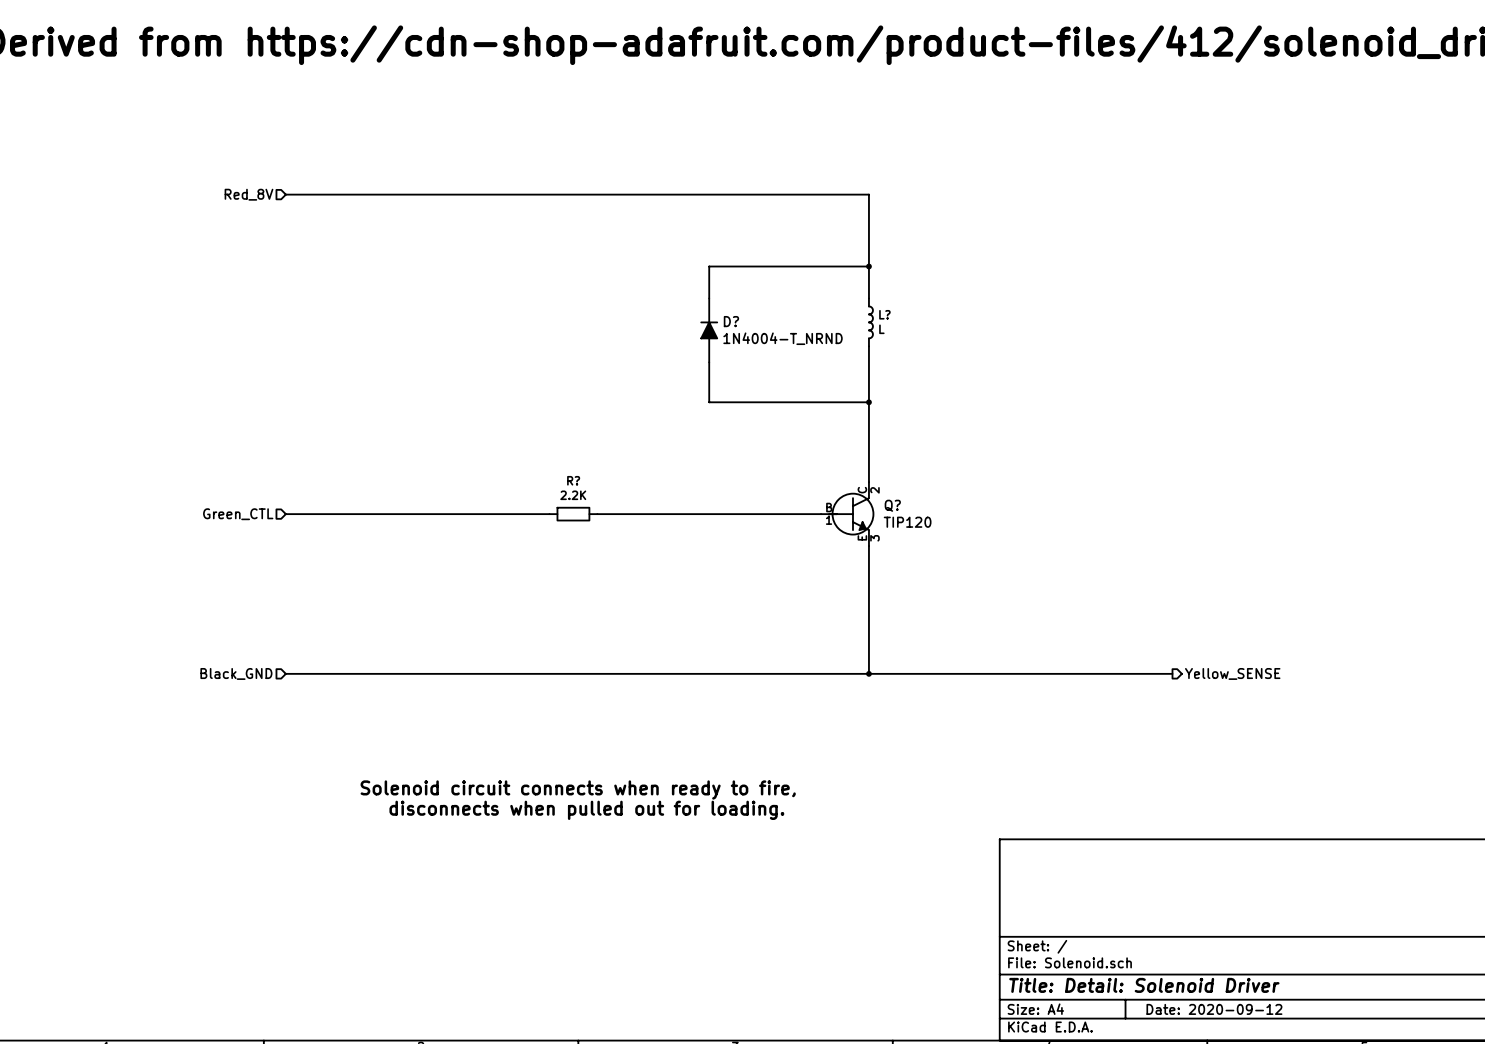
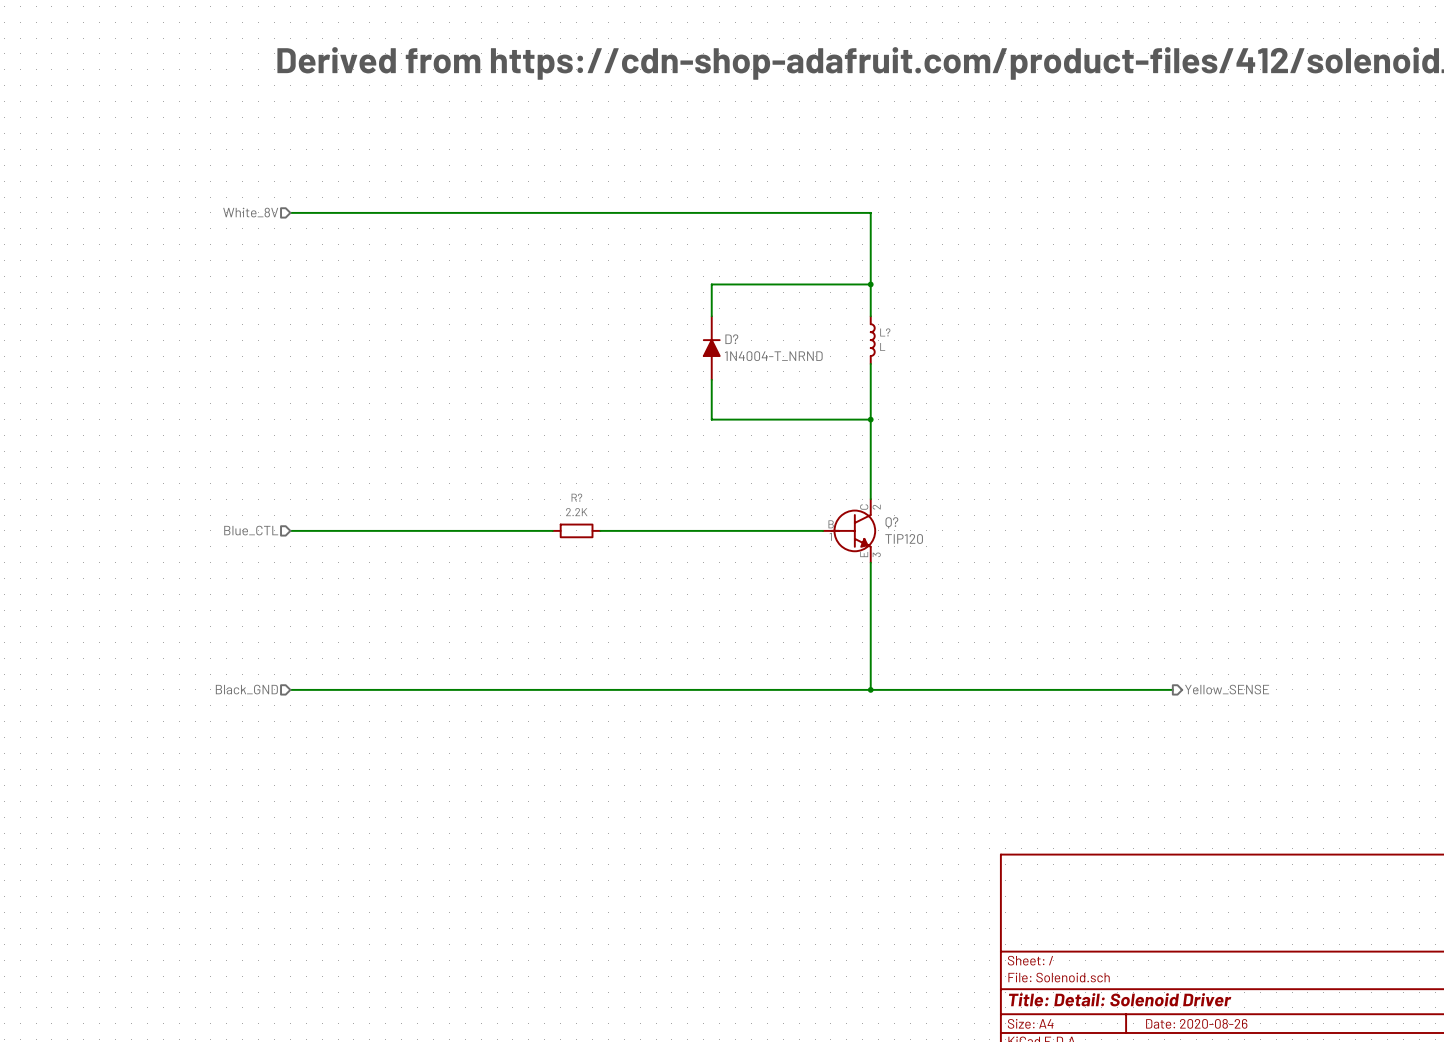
hierarchical label: Red_8V (248, 194) -> White_8V (250, 212)
hierarchical label: Green_CTL (238, 514) -> Blue_CTL (251, 530)
text: Solenoid circuit connects when ready to fire, (578, 790) -> none
text: disconnects when pulled out for loading. (586, 810) -> none
title block: Date: 2020-09-12 (1214, 1009) -> Date: 2020-08-26 (1196, 1023)

